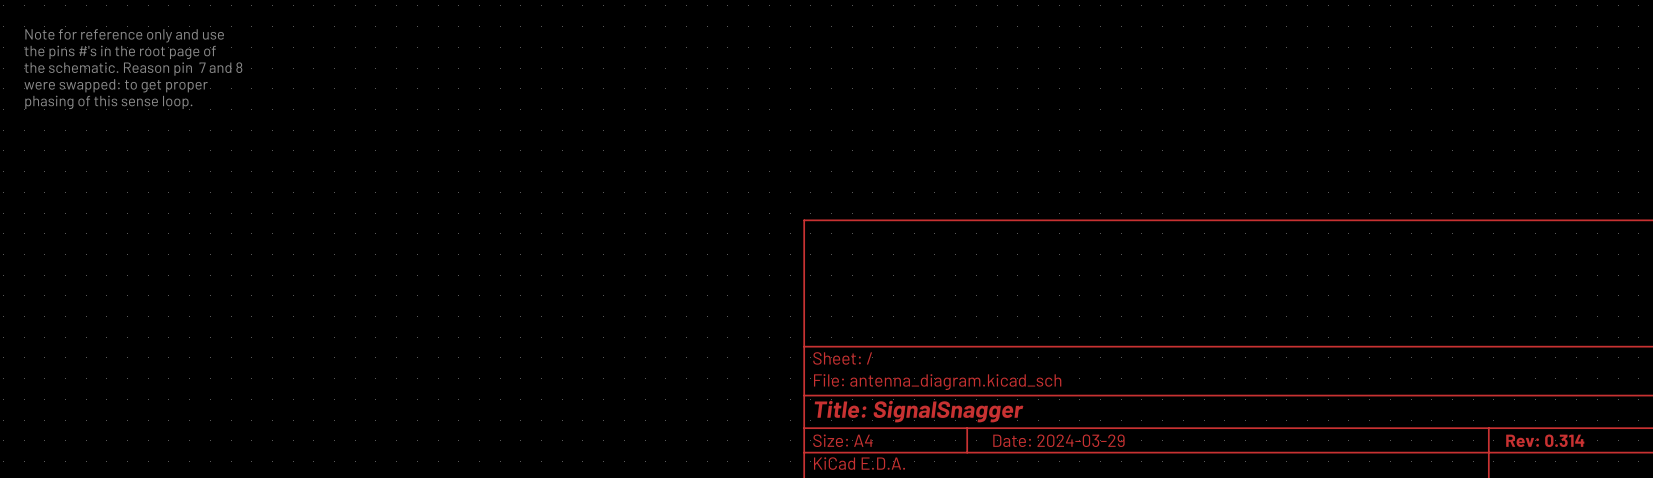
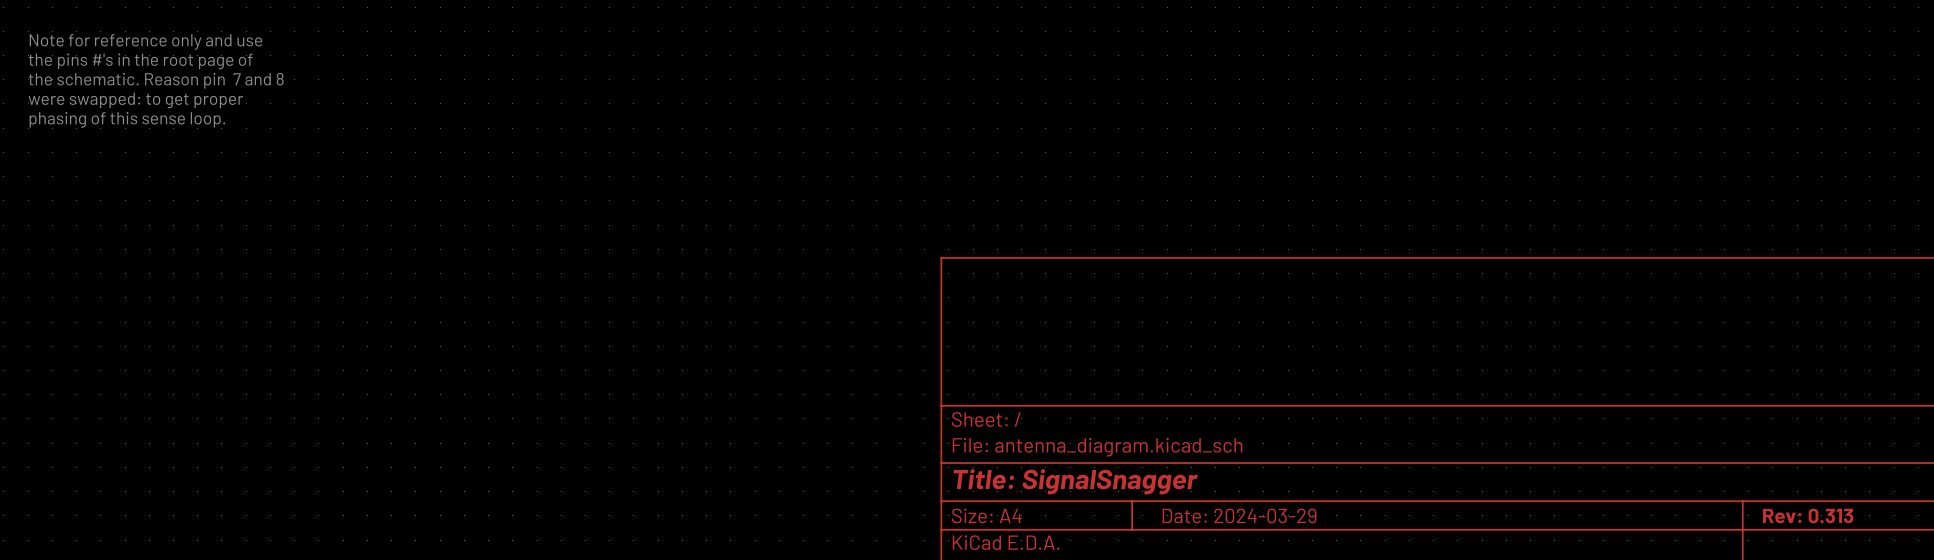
title block: Rev: 0.314 (1545, 440) -> Rev: 0.313 (1808, 515)

